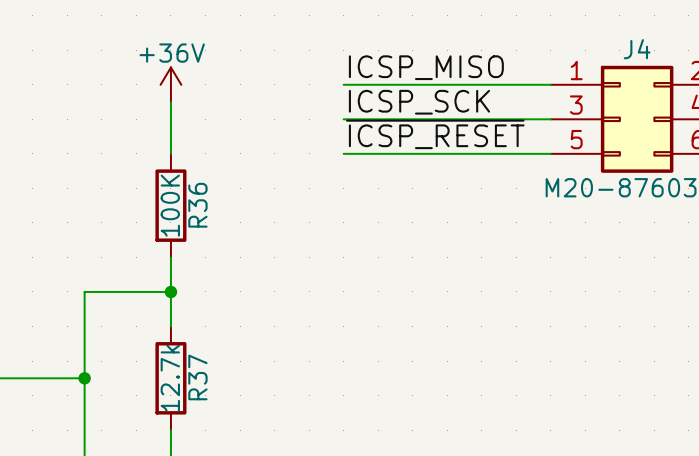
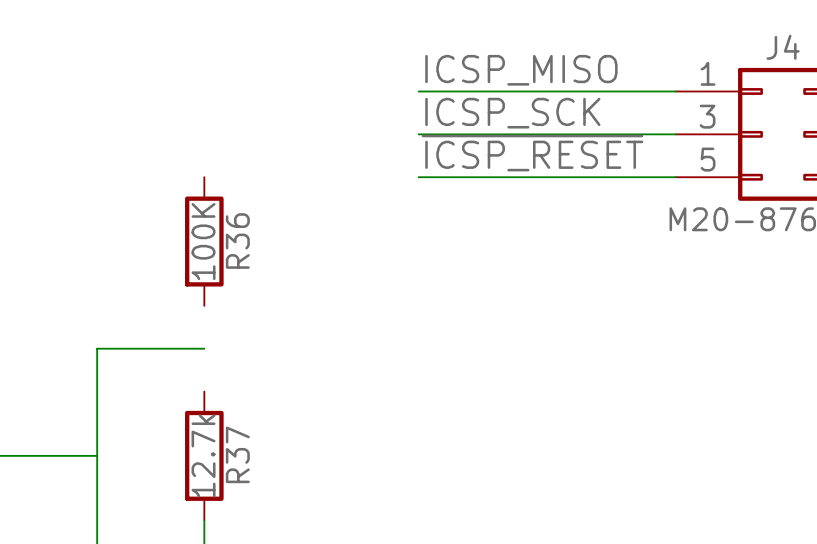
power symbol: +36V (170, 84) -> none
wire: (170, 102) (170, 153) -> none
wire: (170, 257) (170, 326) -> none
junction: (170, 291) -> none
junction: (84, 378) -> none

